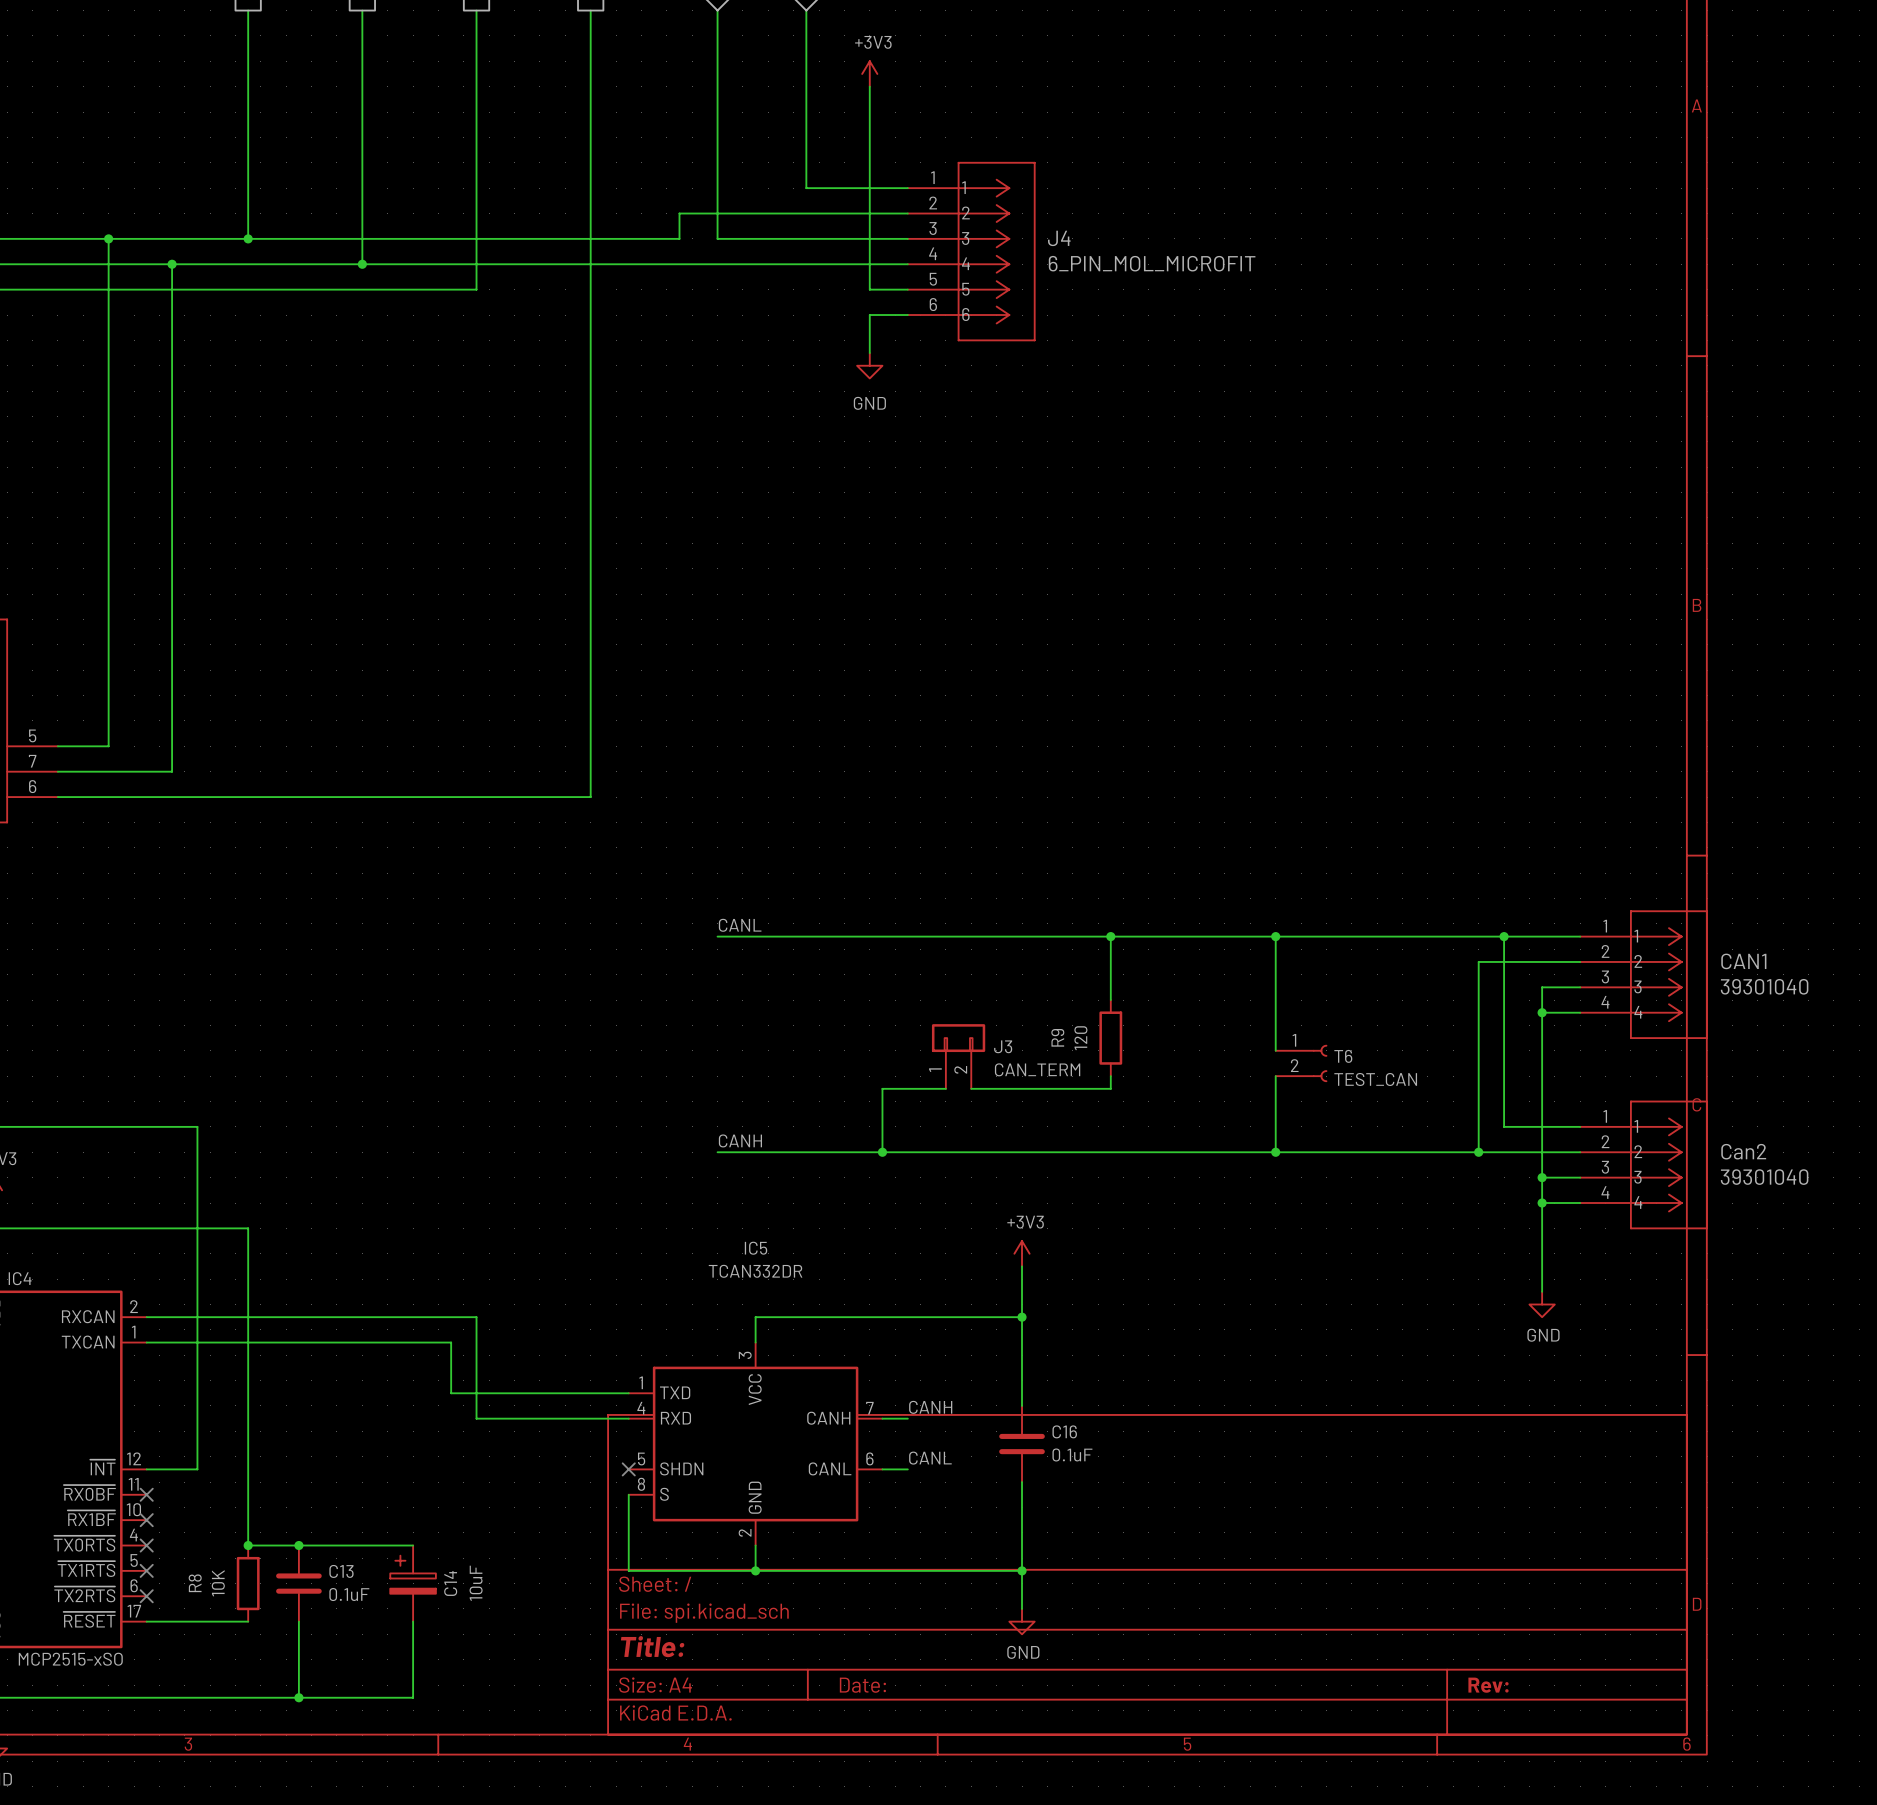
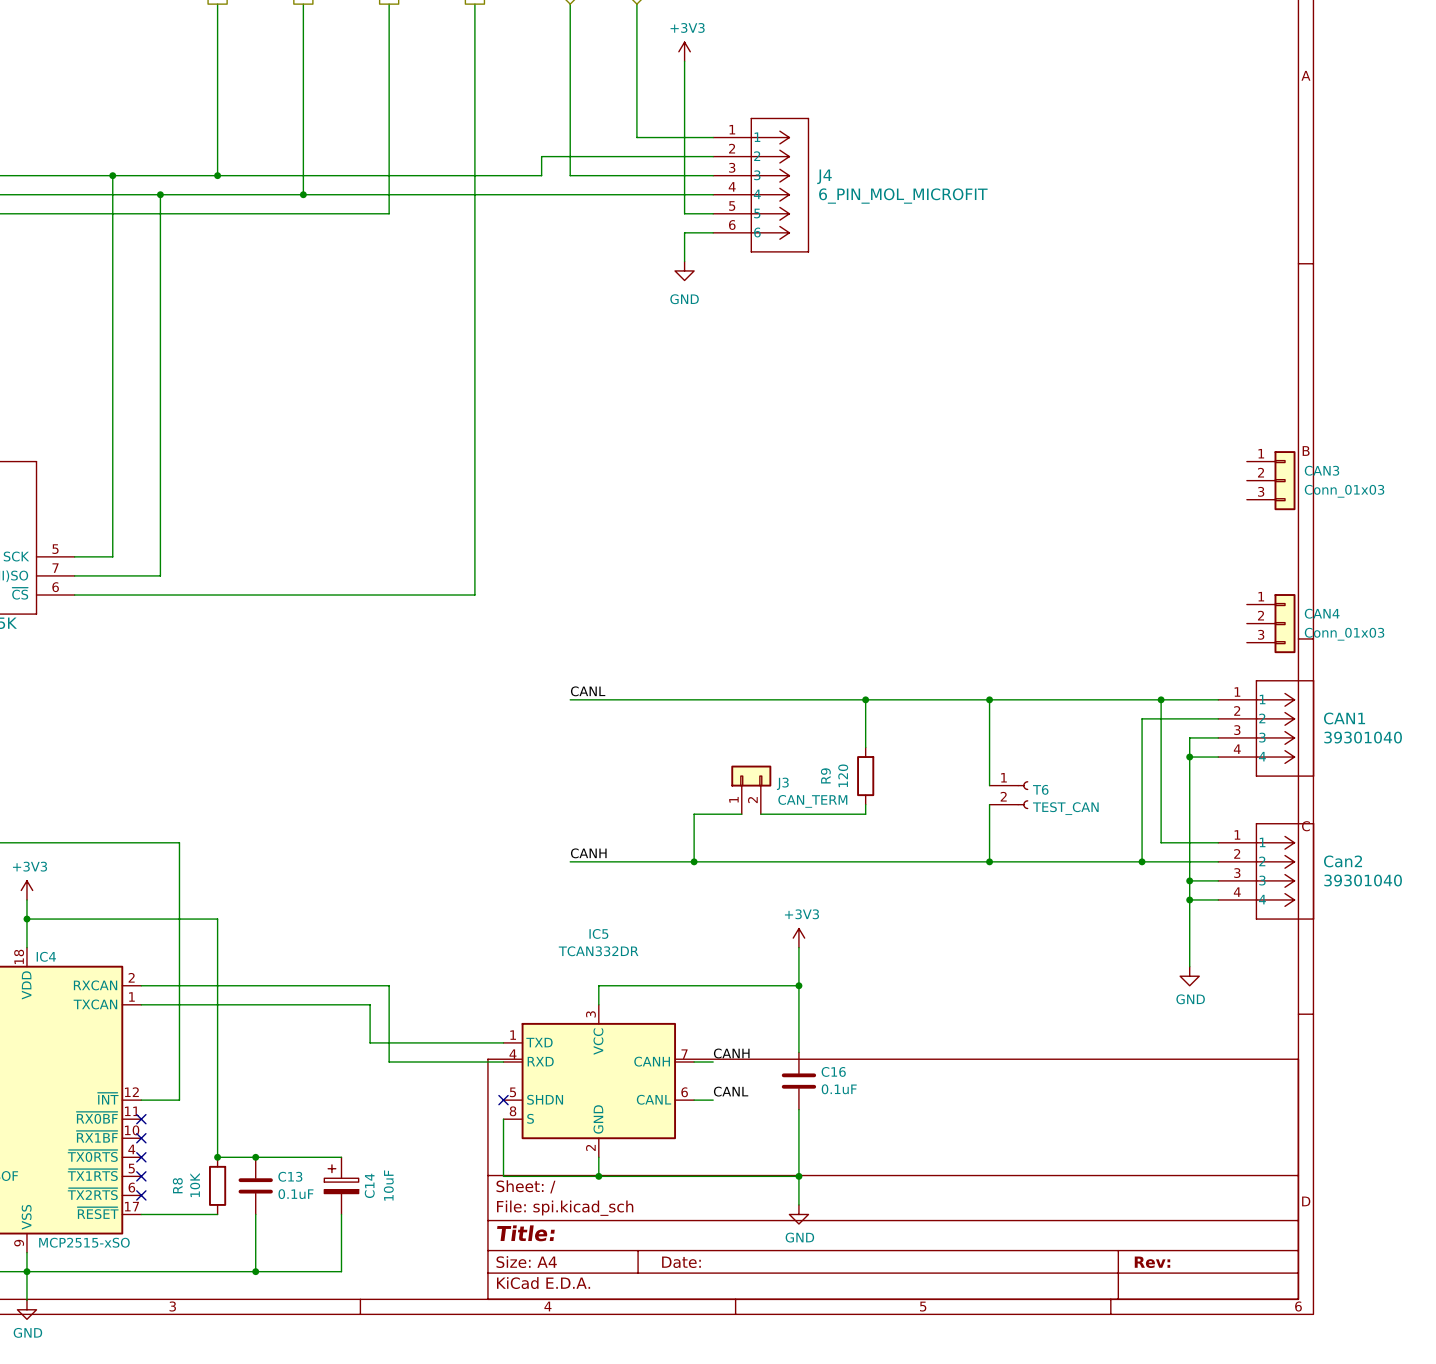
CAN3: none -> Conn_01x03 (1271, 480)
CAN4: none -> Conn_01x03 (1271, 623)

